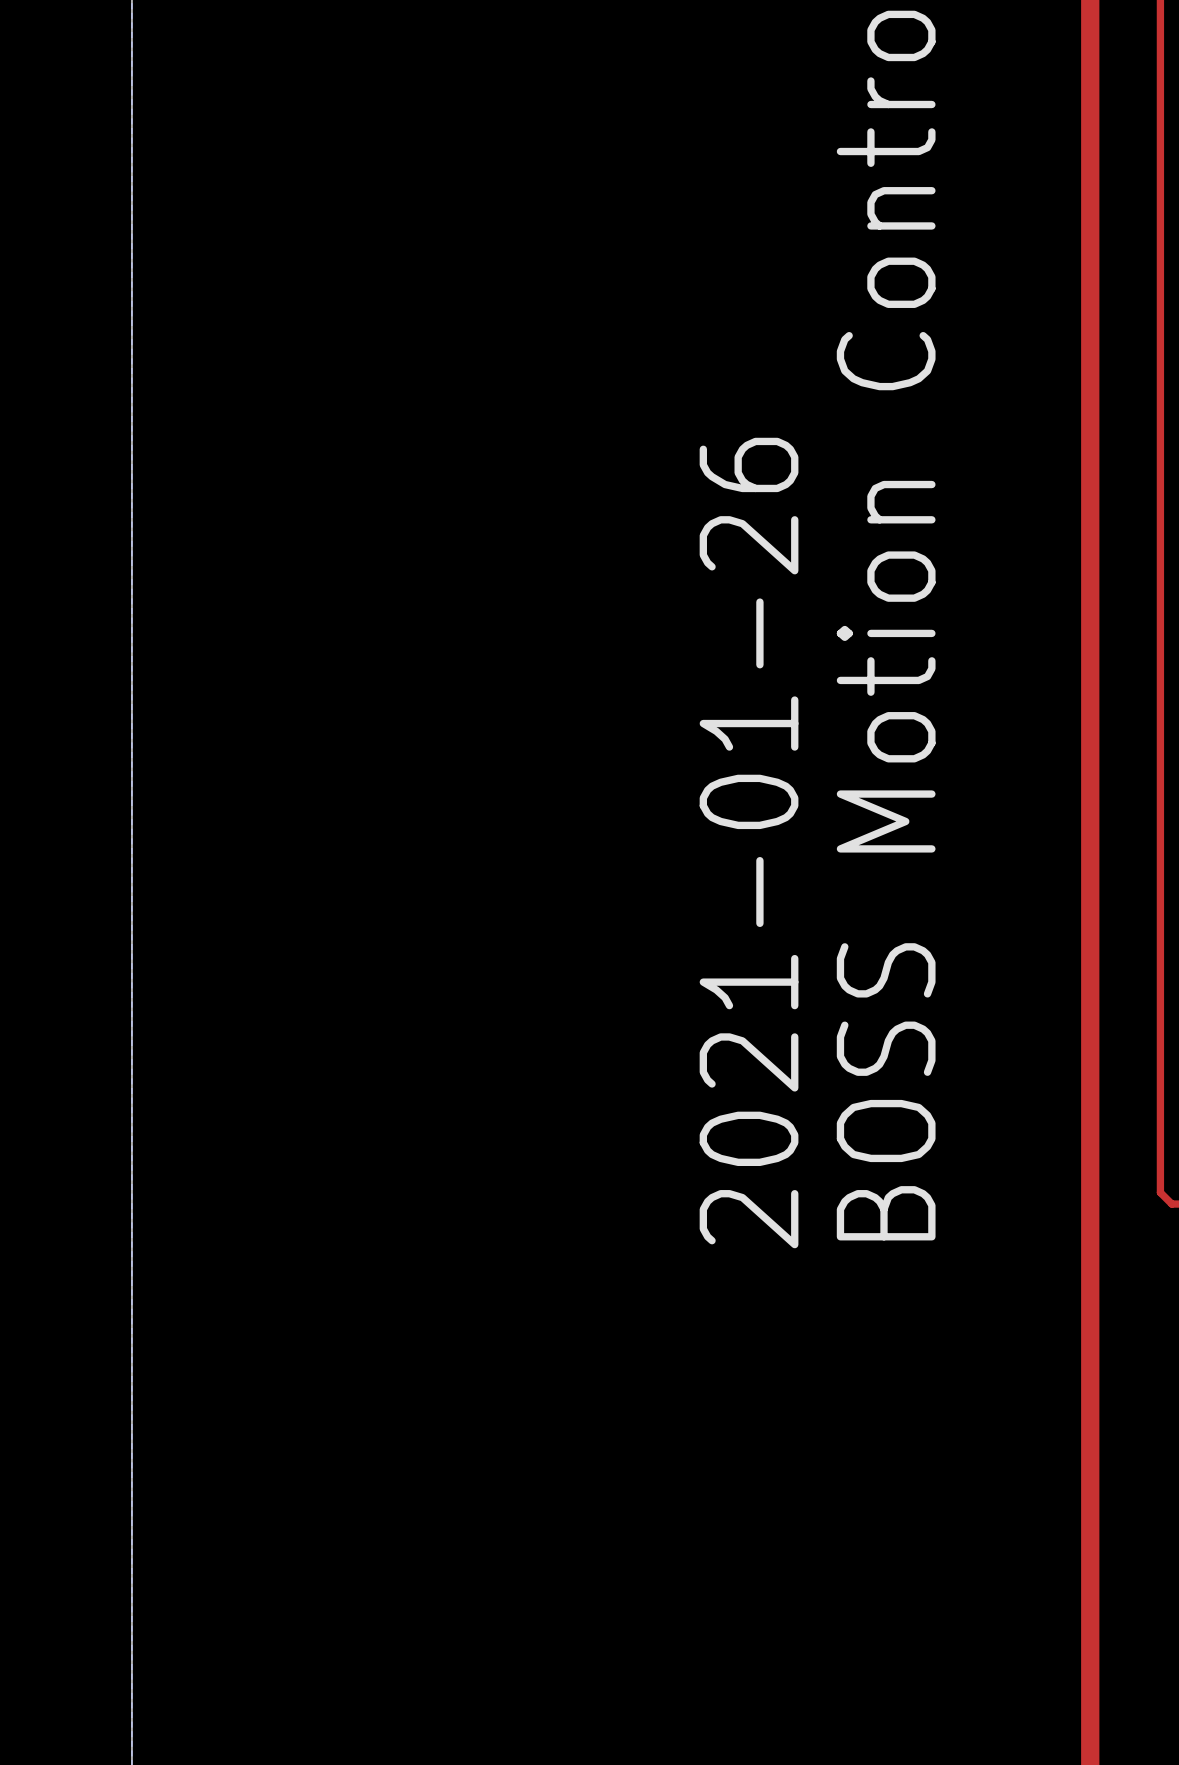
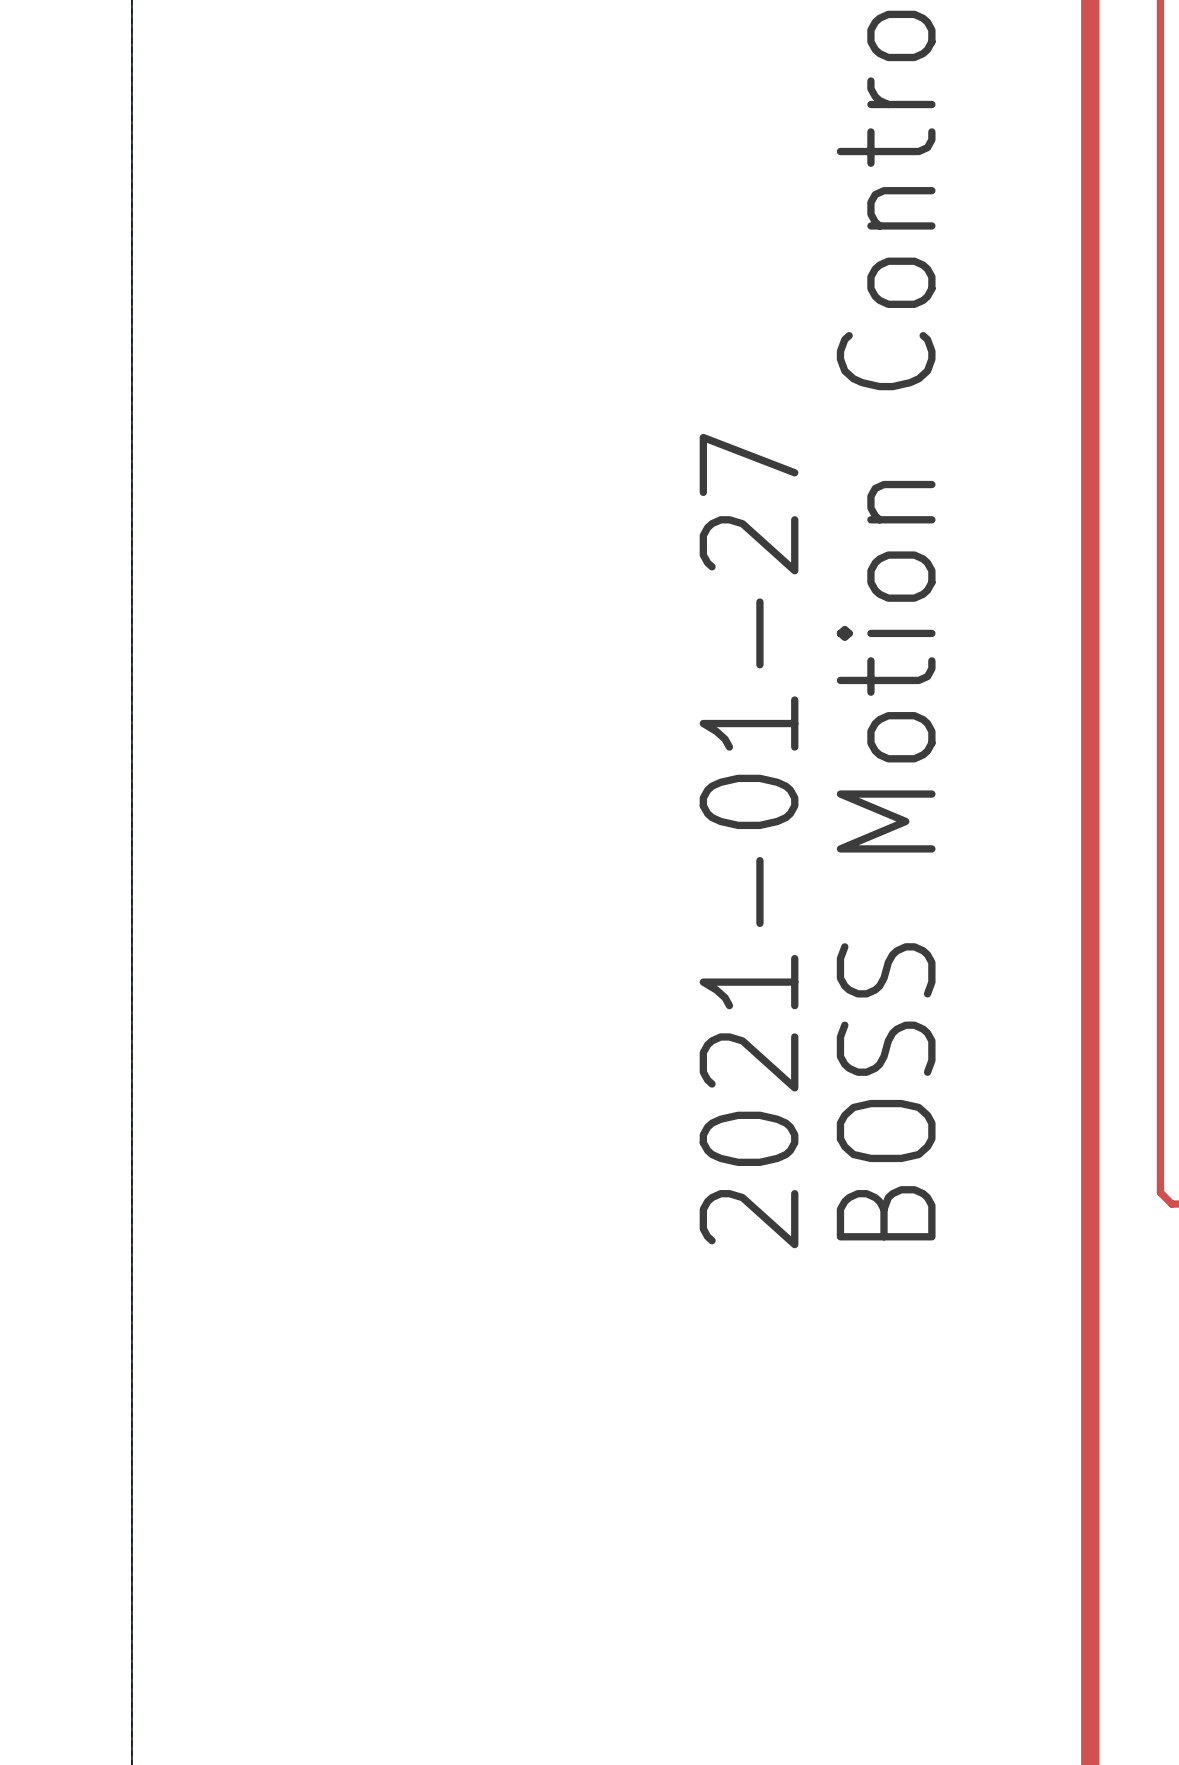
text: 2021-01-26 (749, 843) -> 2021-01-27 (749, 841)

